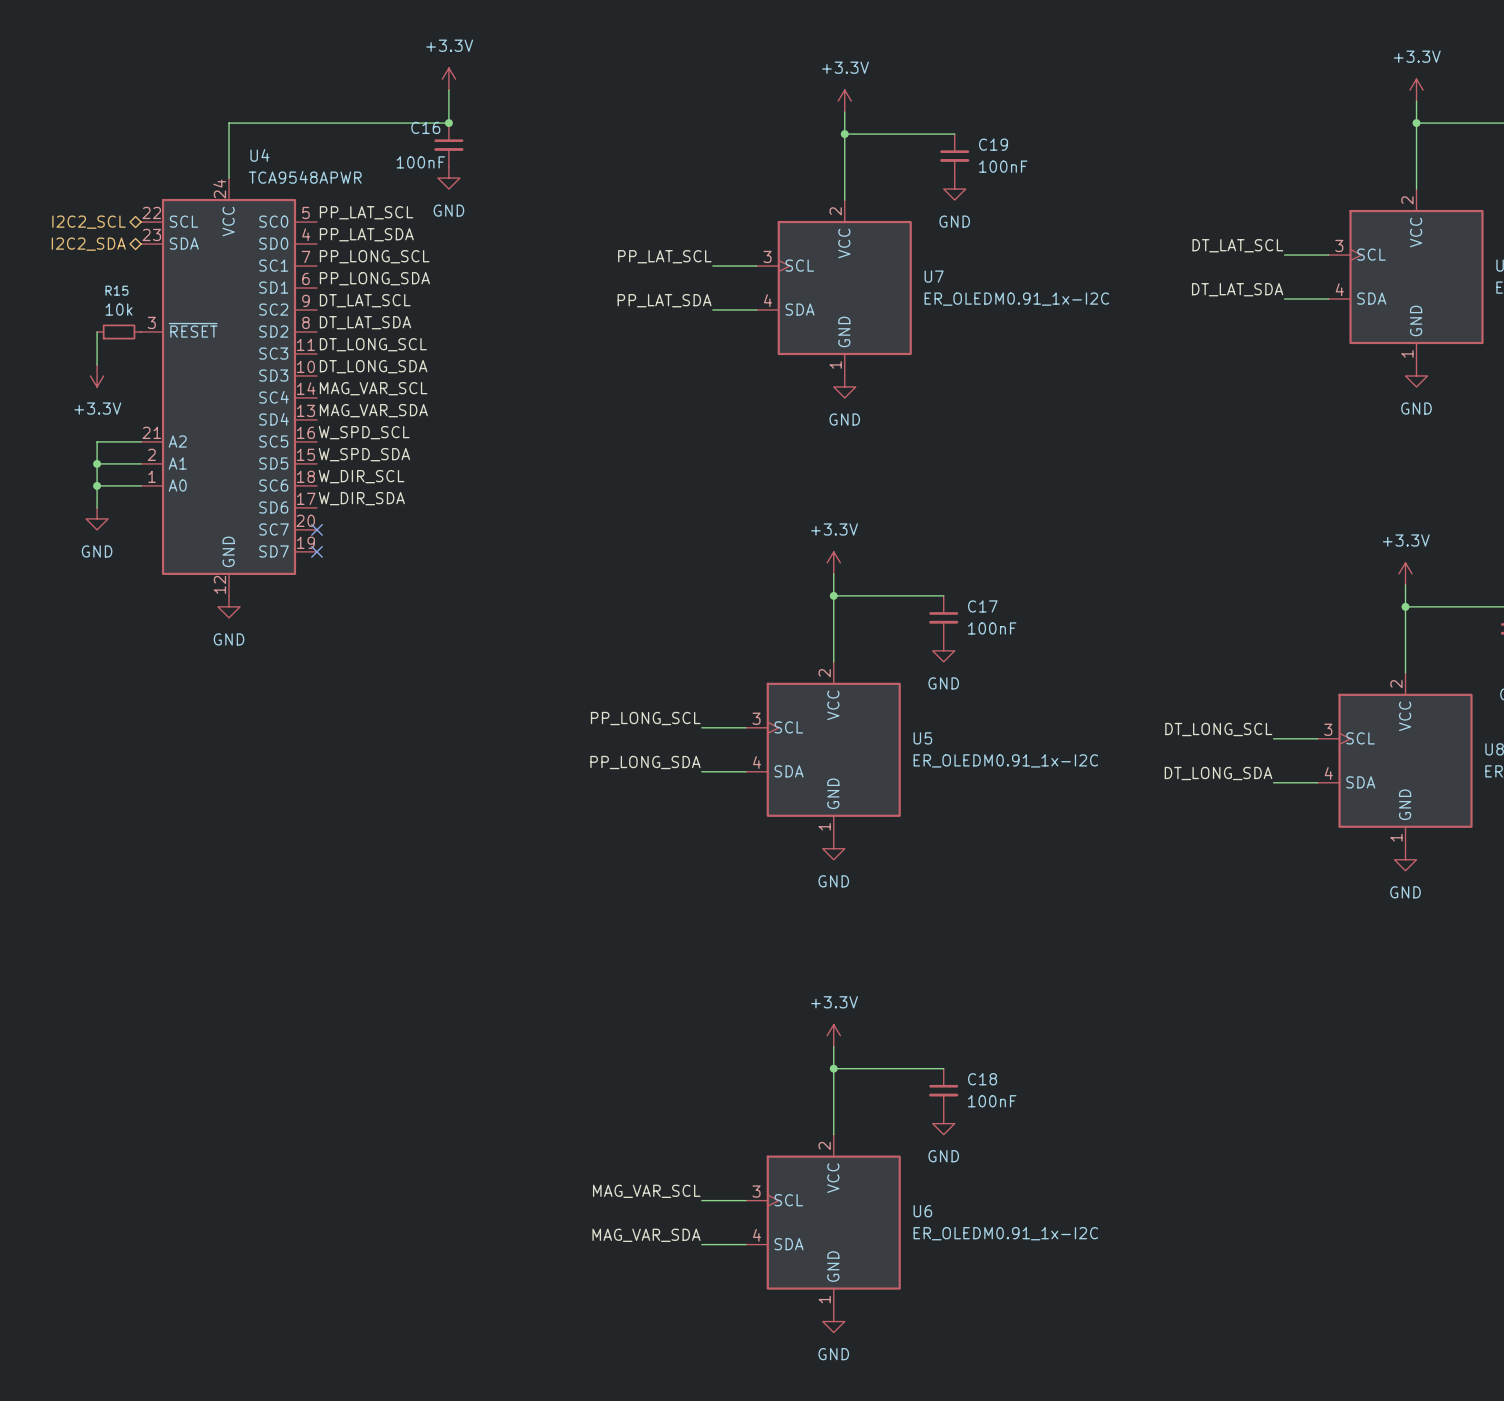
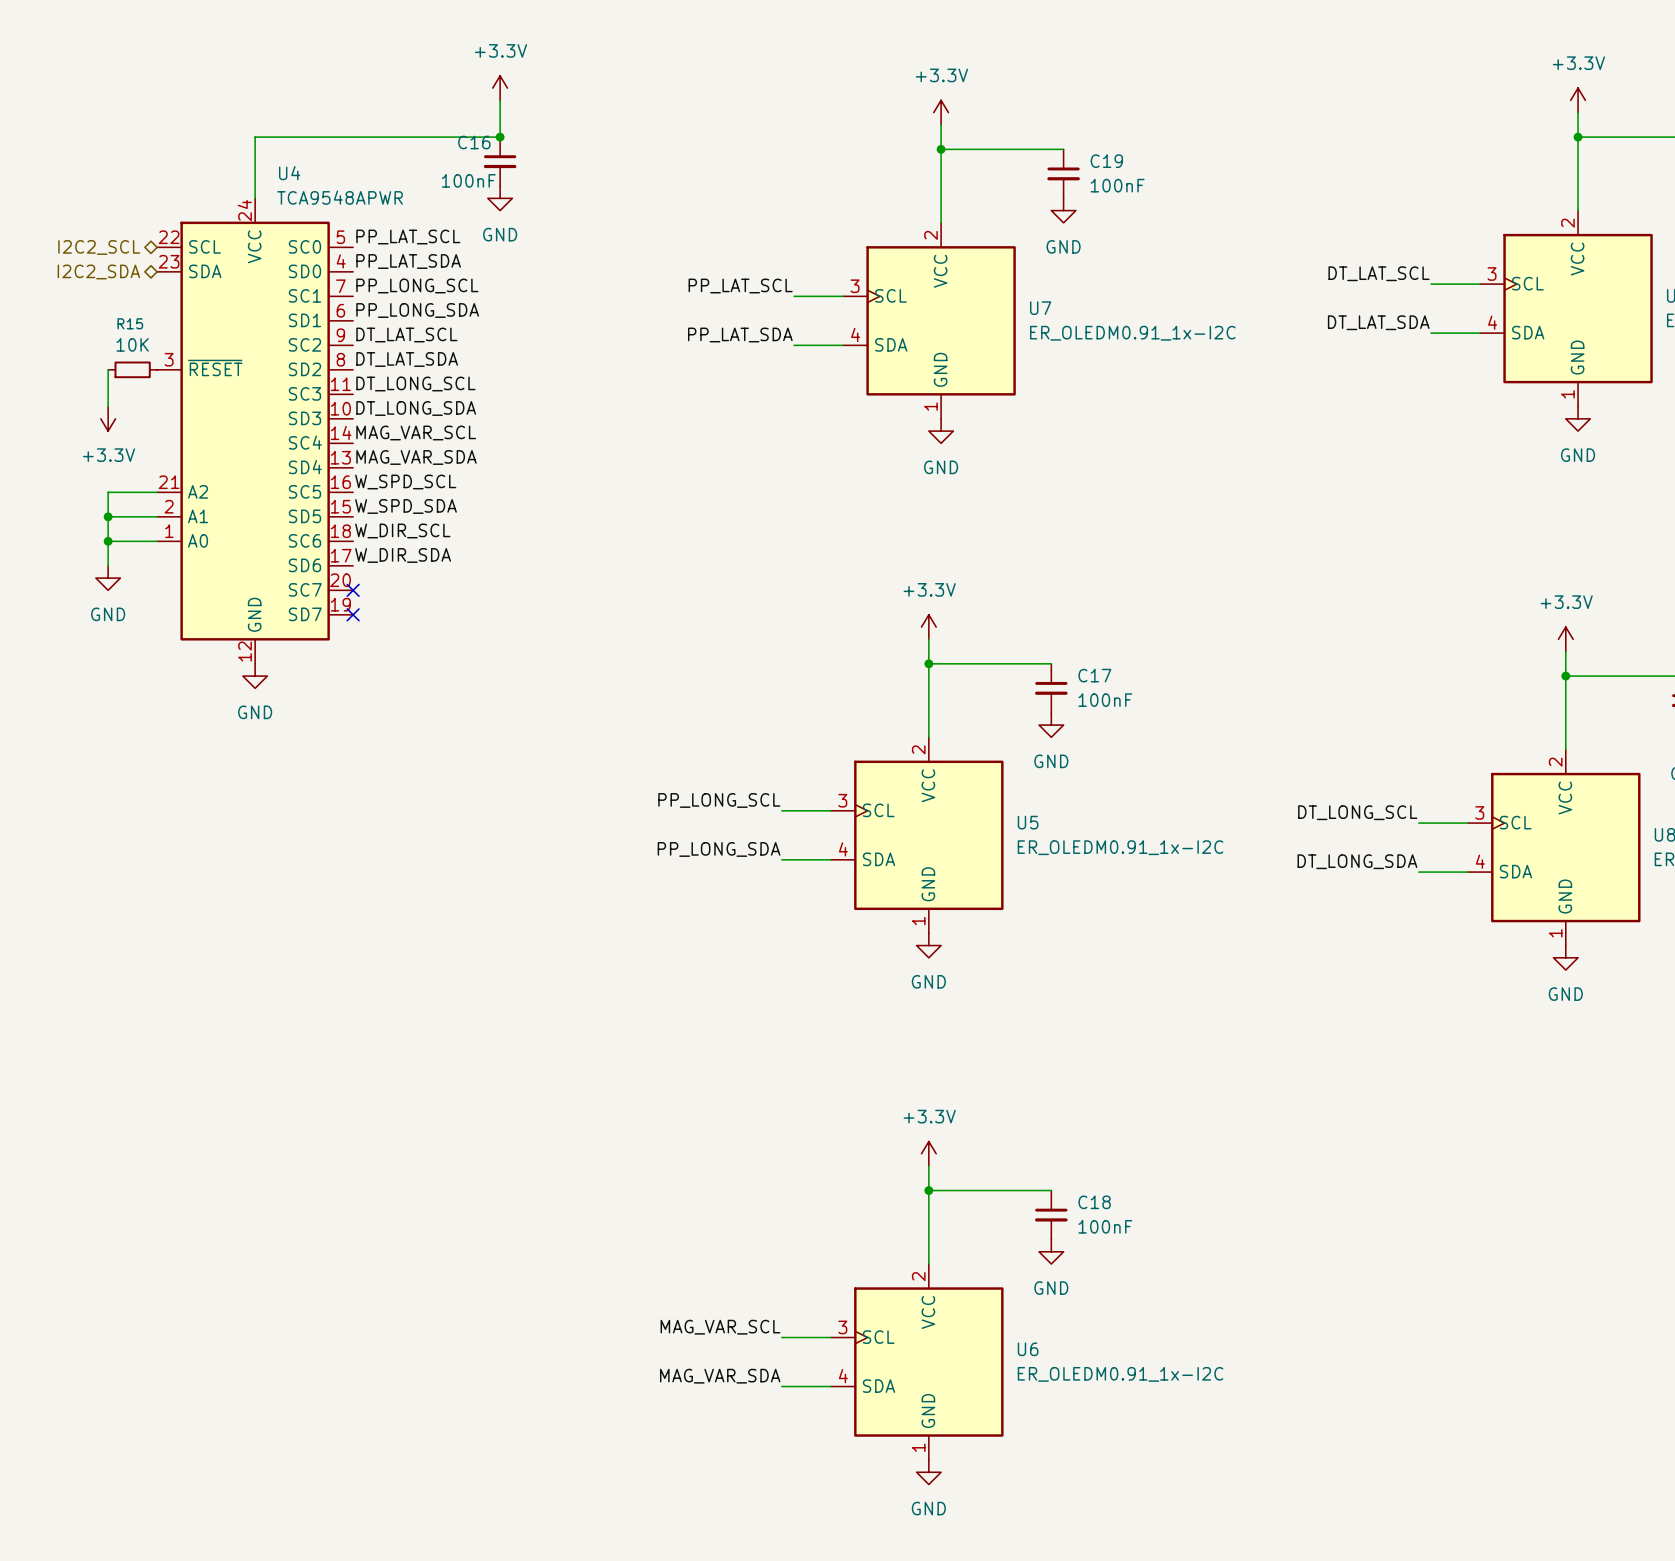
R15 value: 10k (119, 309) -> 10K (132, 344)

